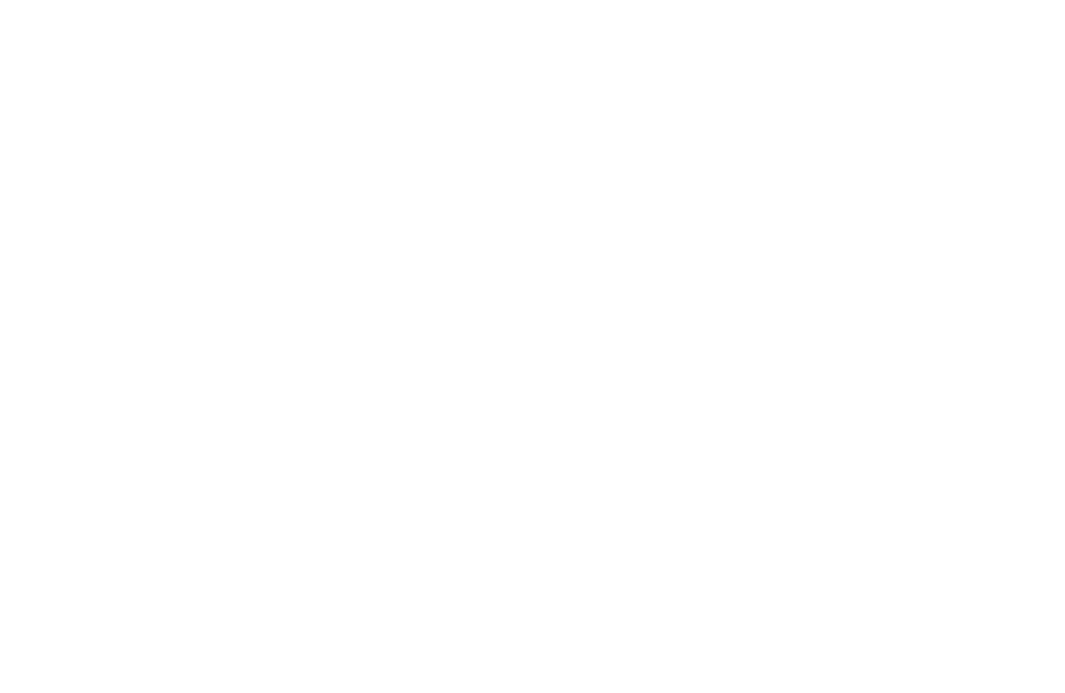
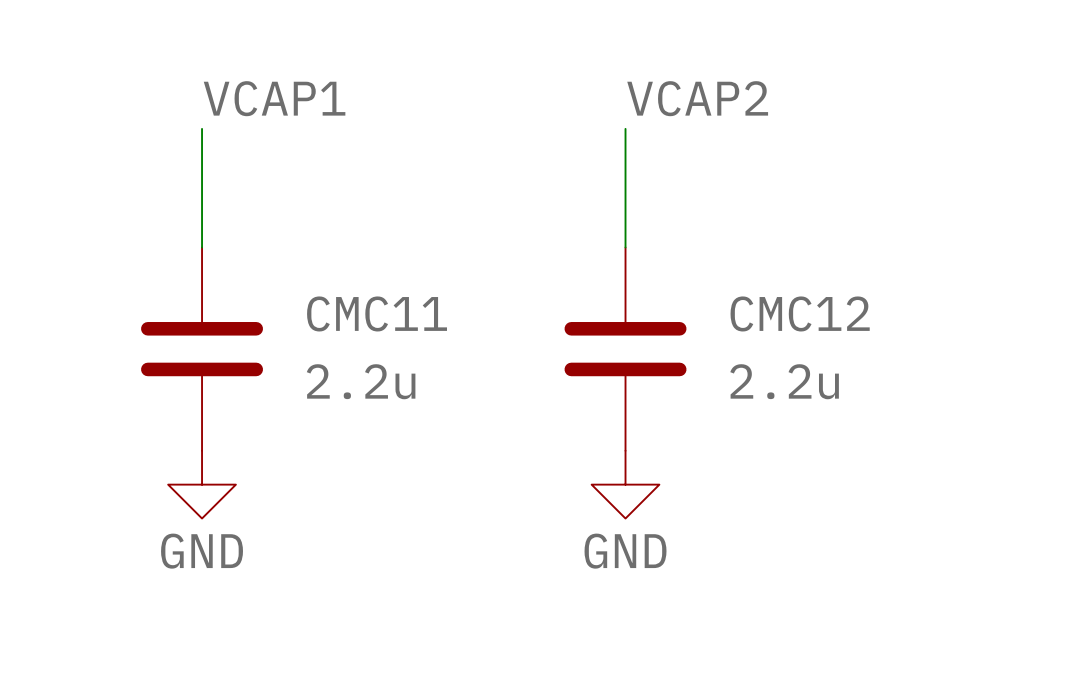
label: none -> VCAP1 (274, 98)
label: none -> VCAP2 (697, 98)
wire: none -> (202, 128) (202, 247)
wire: none -> (625, 128) (625, 247)
CMC11: none -> 2.2u (202, 349)
CMC12: none -> 2.2u (625, 349)
power symbol: none -> GND (202, 484)
power symbol: none -> GND (625, 484)

